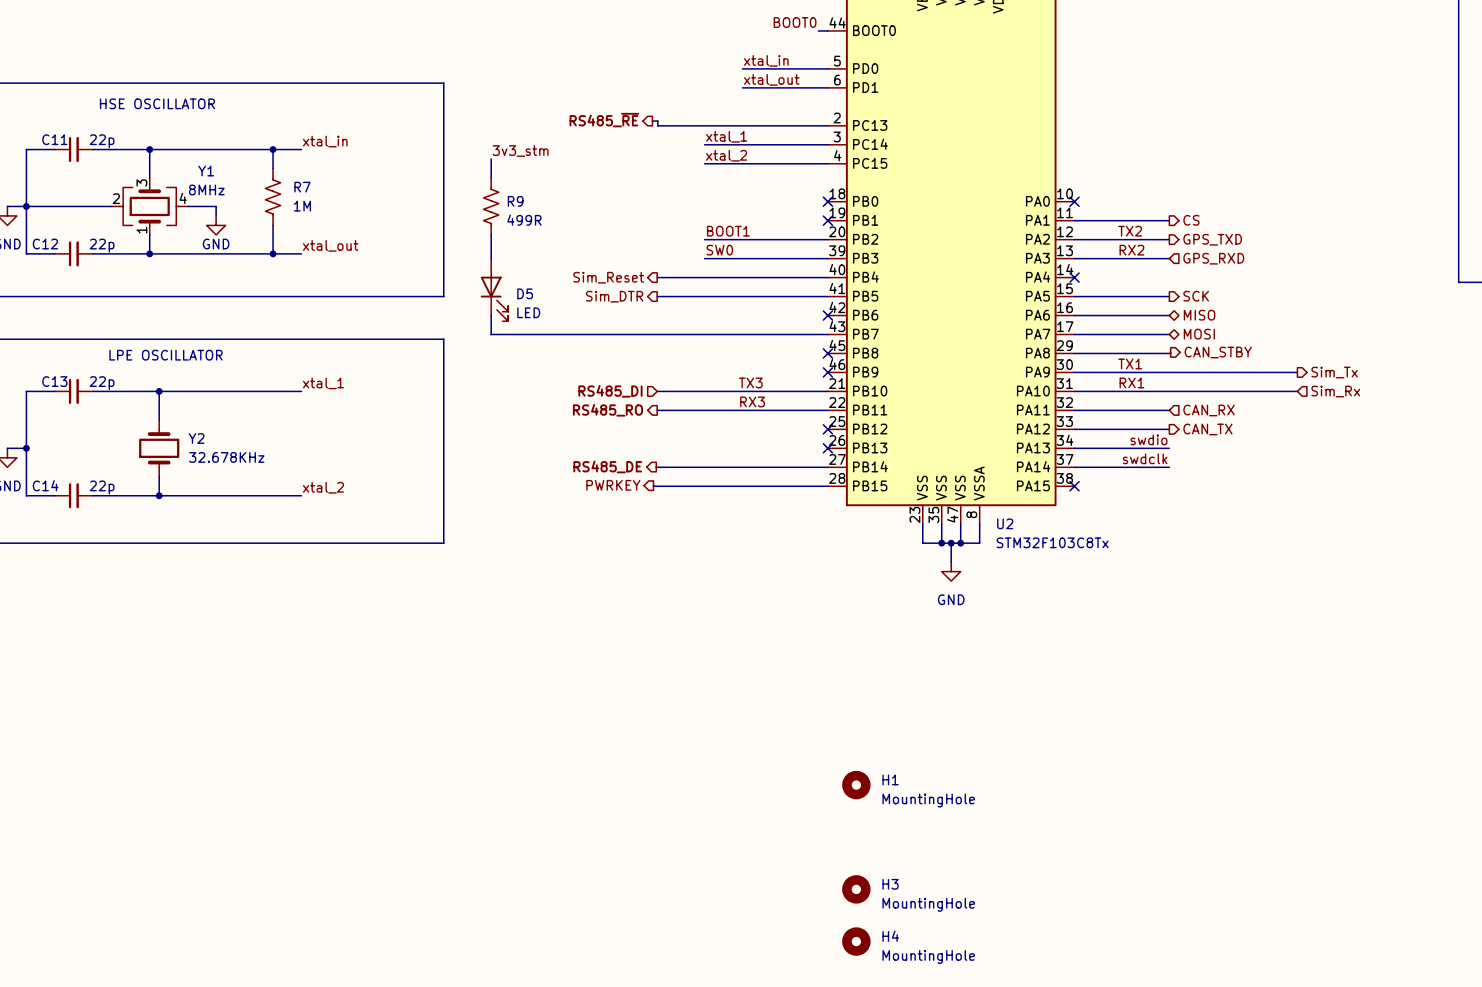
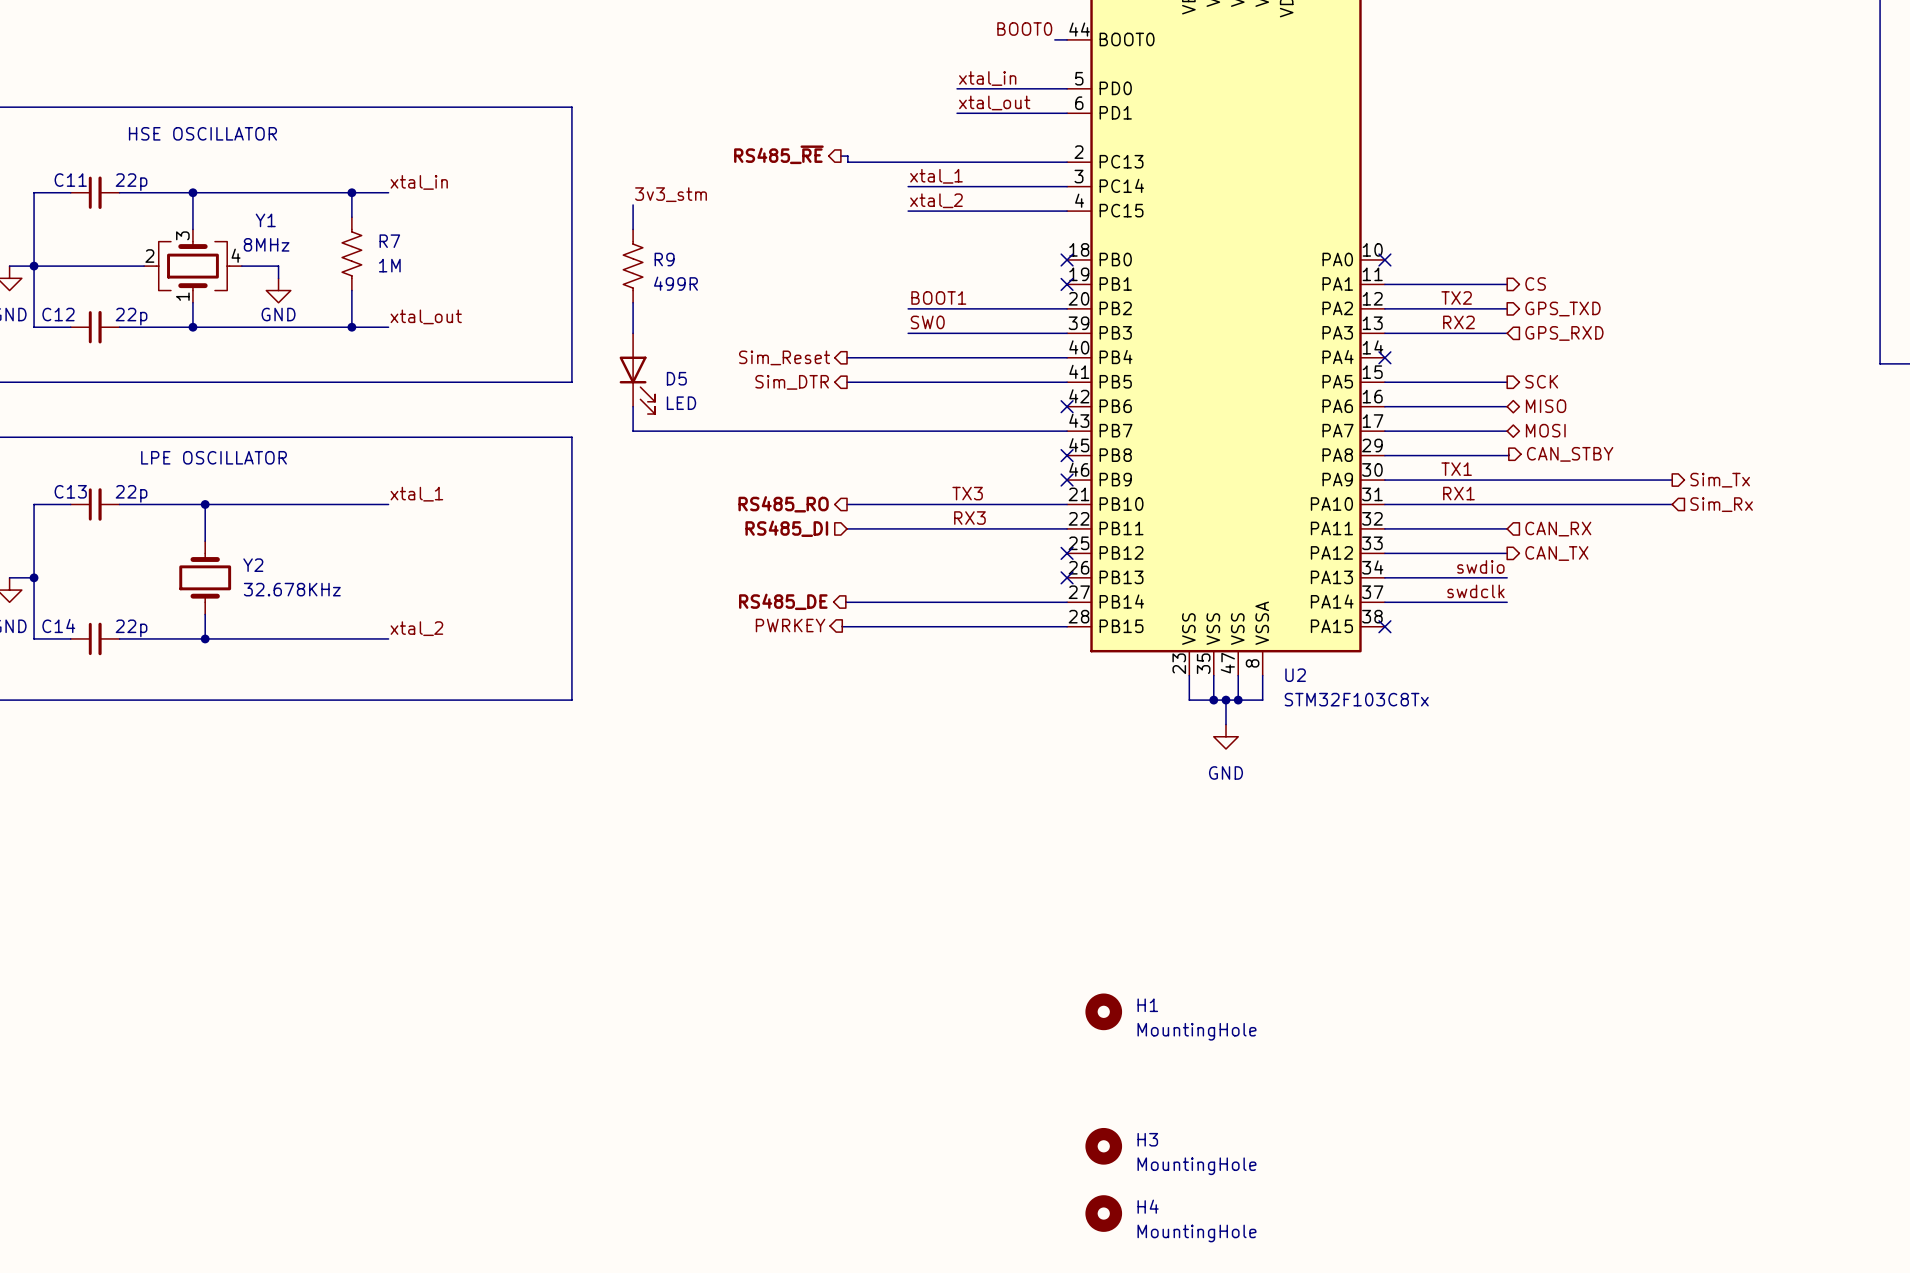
hierarchical label shape: input (610, 391) -> output (783, 504)
hierarchical label: RS485_DI (610, 391) -> RS485_RO (783, 504)
hierarchical label shape: output (607, 410) -> input (786, 528)
hierarchical label: RS485_RO (607, 410) -> RS485_DI (786, 528)

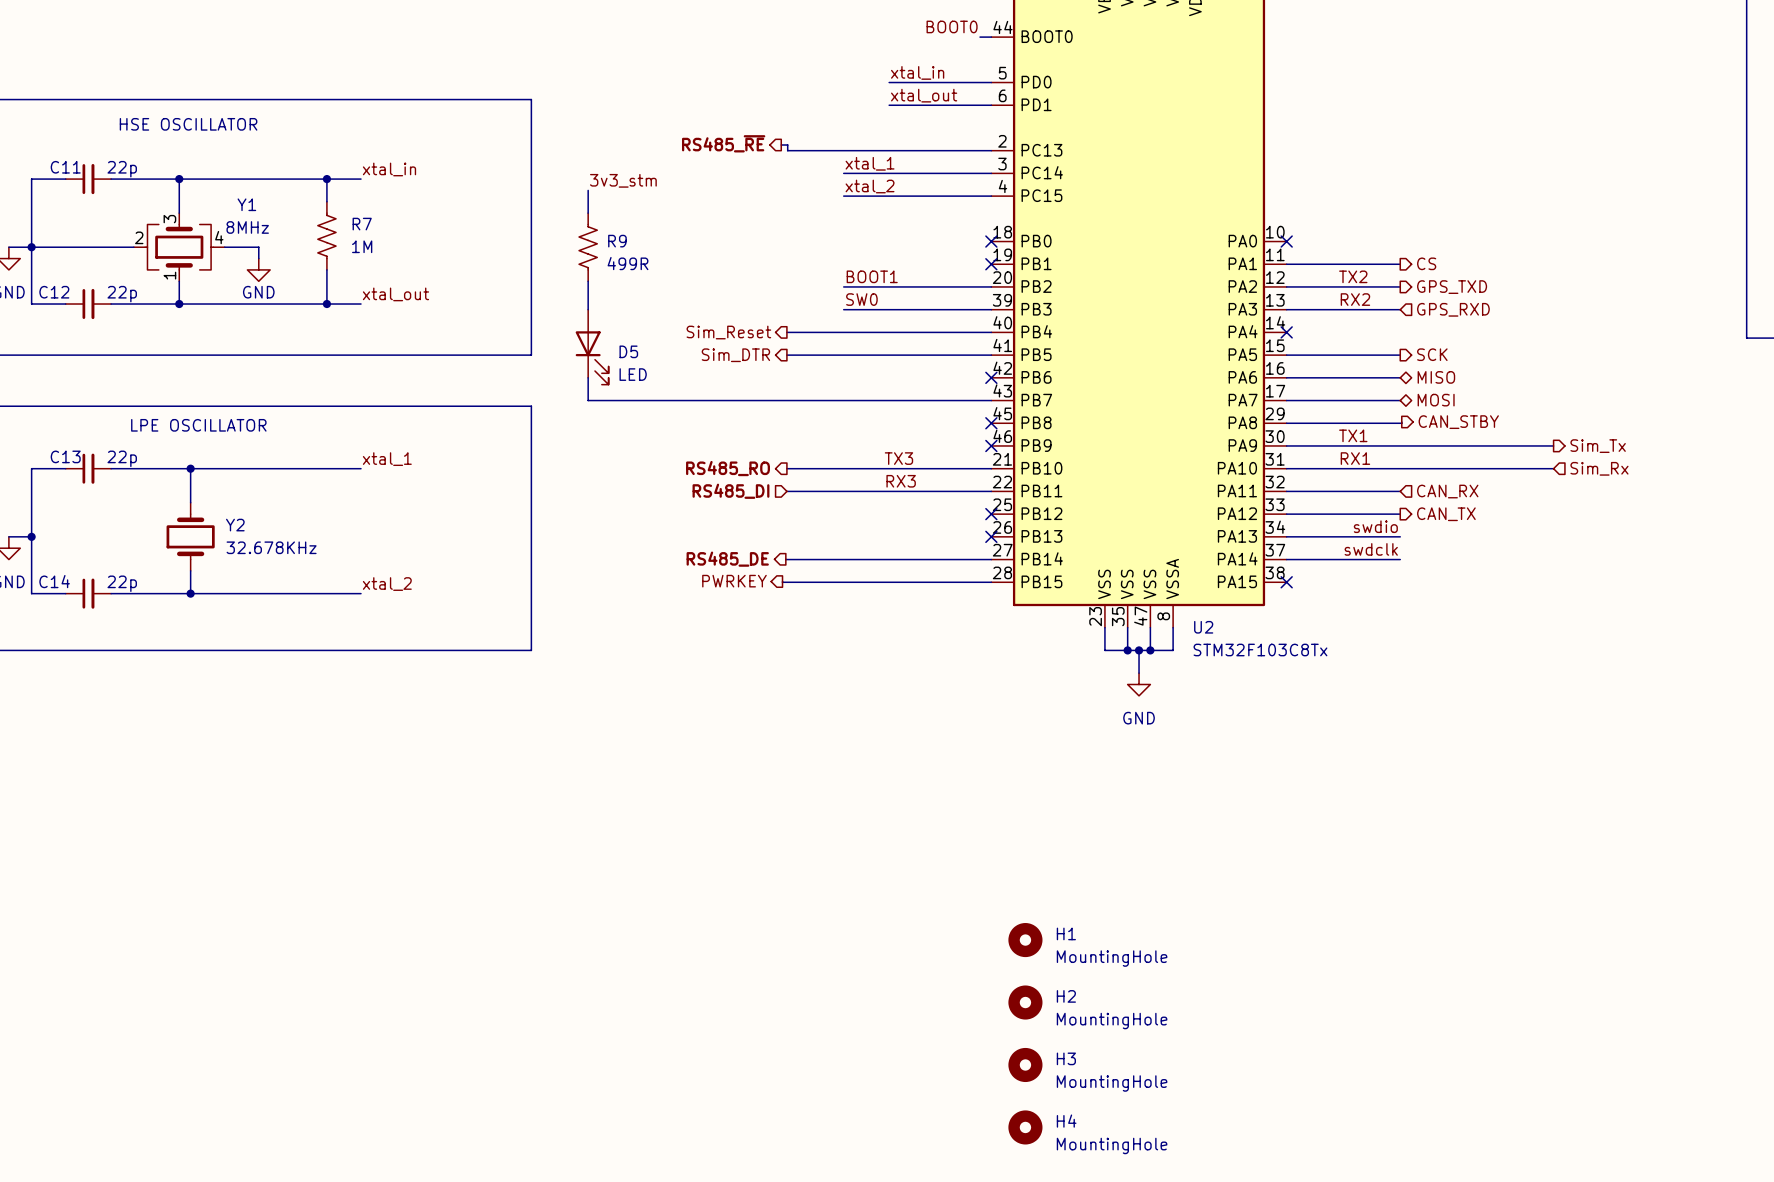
H2: none -> MountingHole (1025, 1002)

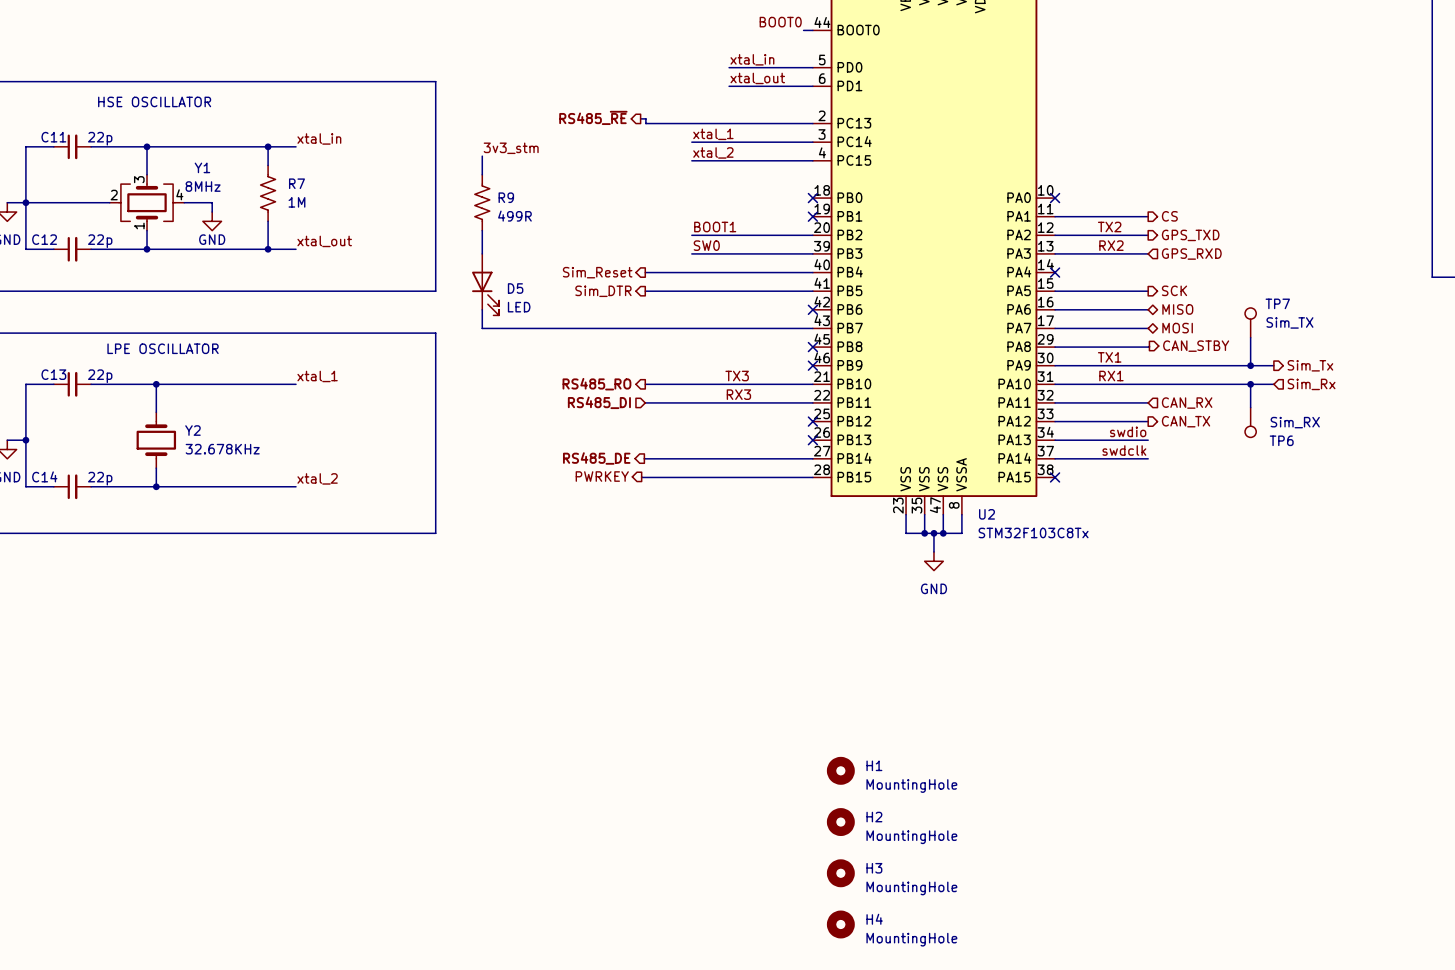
TP7: none -> Sim_TX (1250, 322)
wire: none -> (1250, 337) (1250, 365)
junction: none -> (1250, 365)
wire: none -> (1250, 384) (1250, 407)
junction: none -> (1250, 384)
TP6: none -> Sim_RX (1250, 422)

